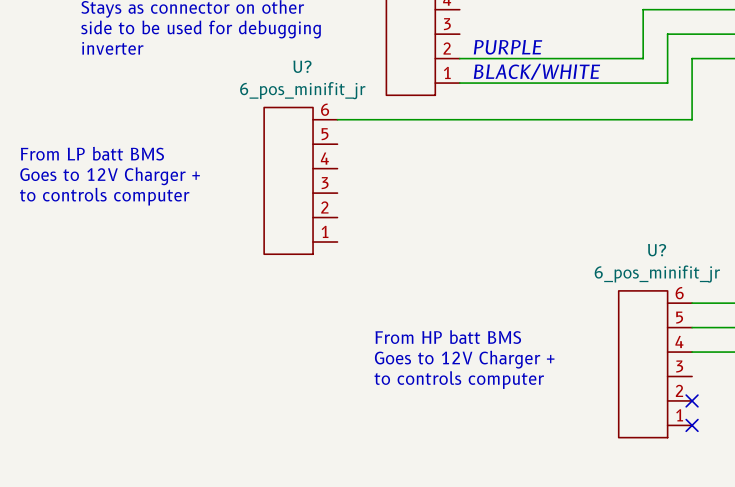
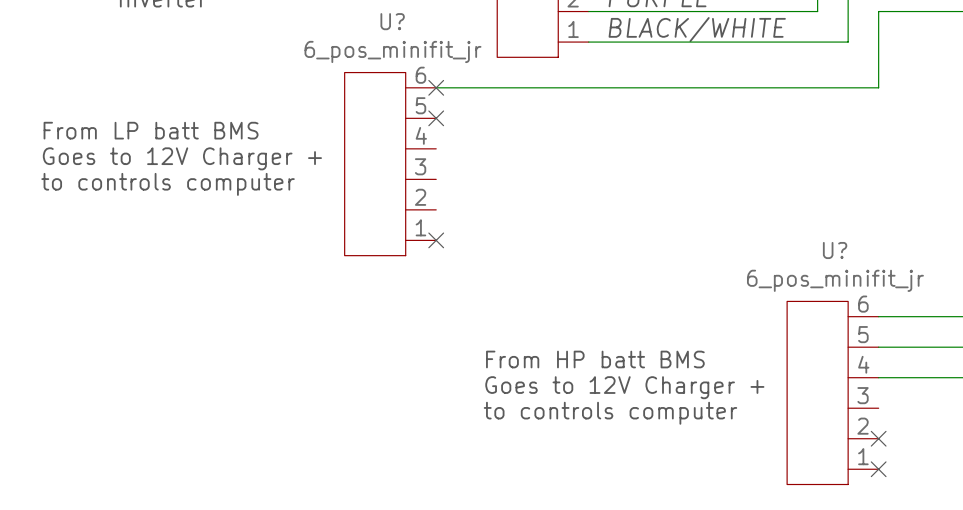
no-connect mark: none -> (436, 87)
no-connect mark: none -> (436, 118)
no-connect mark: none -> (436, 240)

